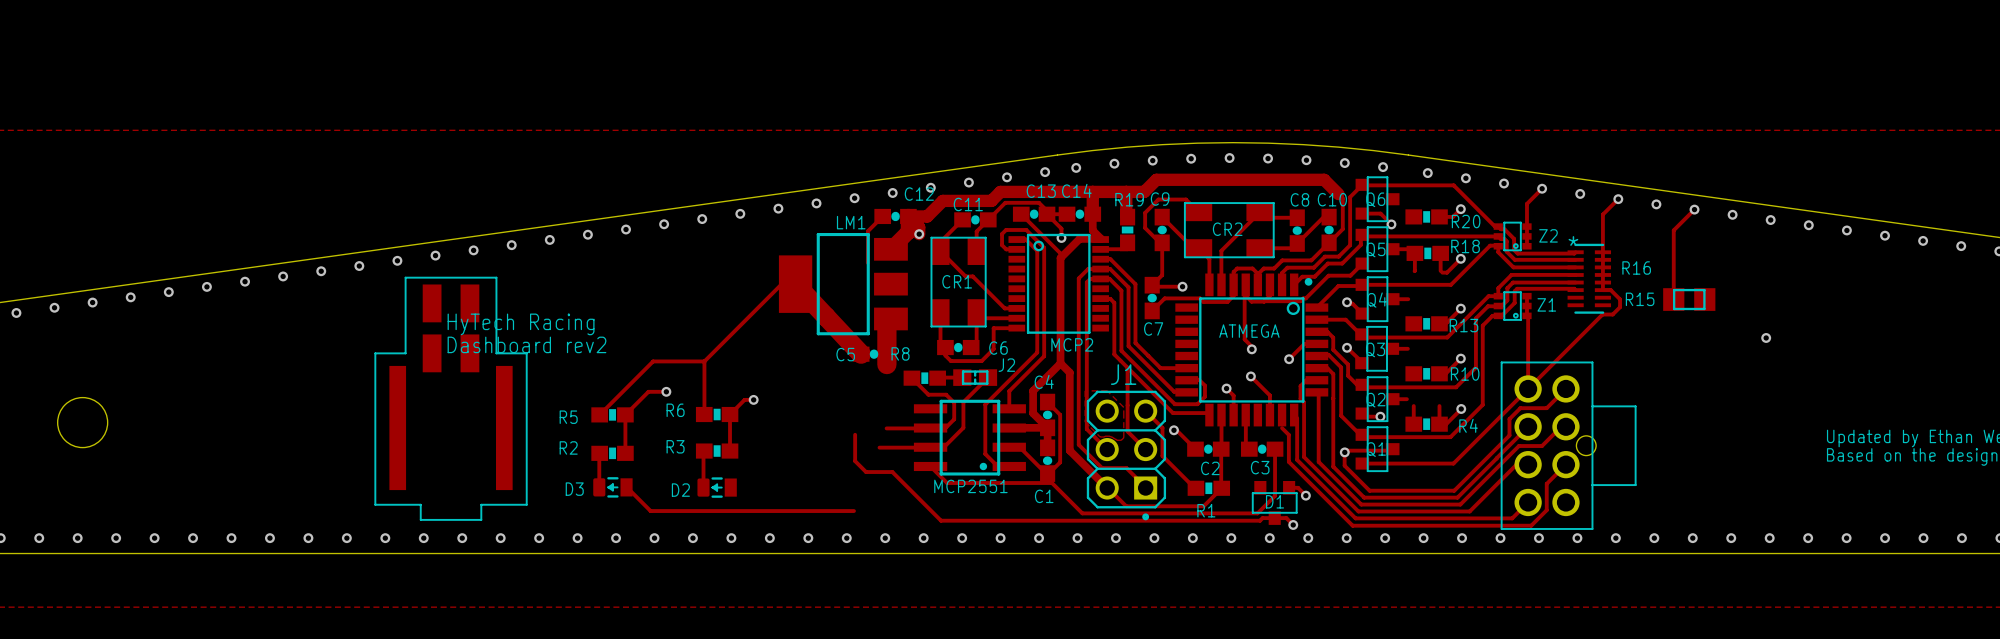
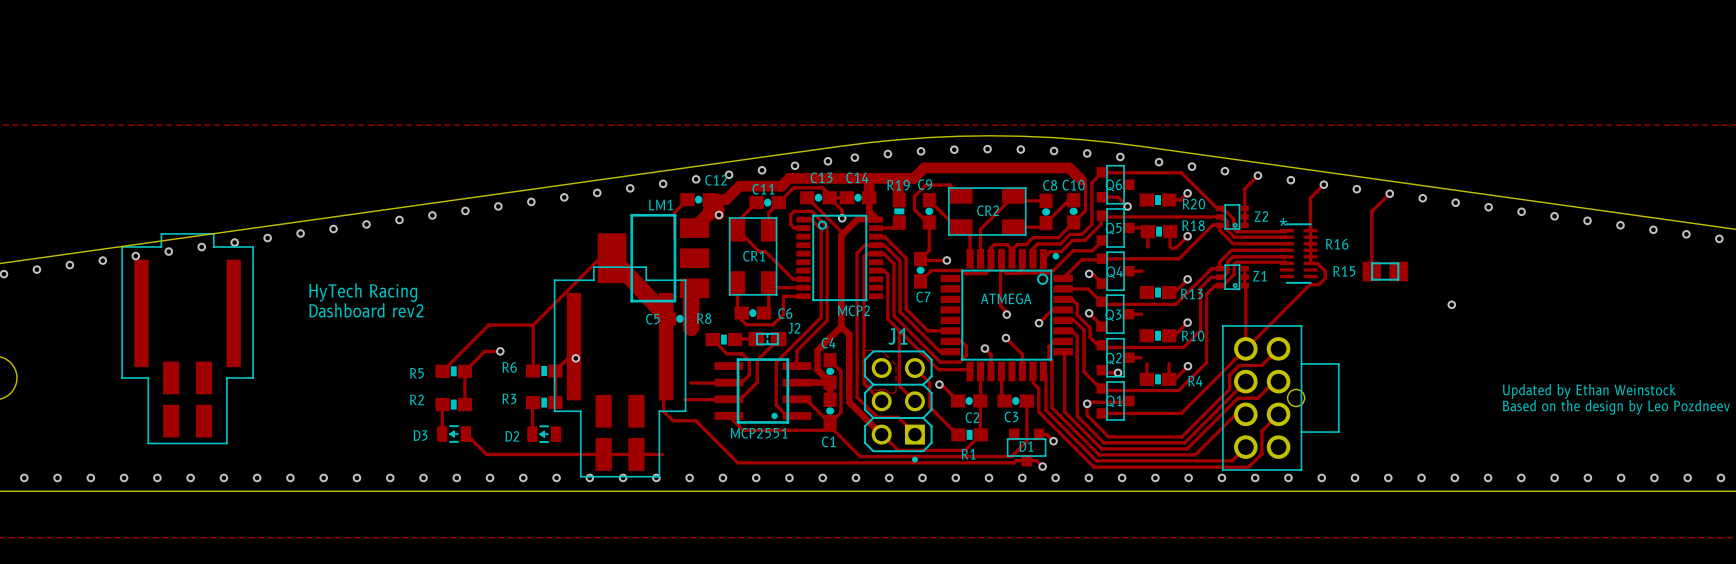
part rotation: 0° (451, 398) -> 180° (187, 338)
part position: (451, 398) -> (187, 338)
part: none -> (620, 371)

